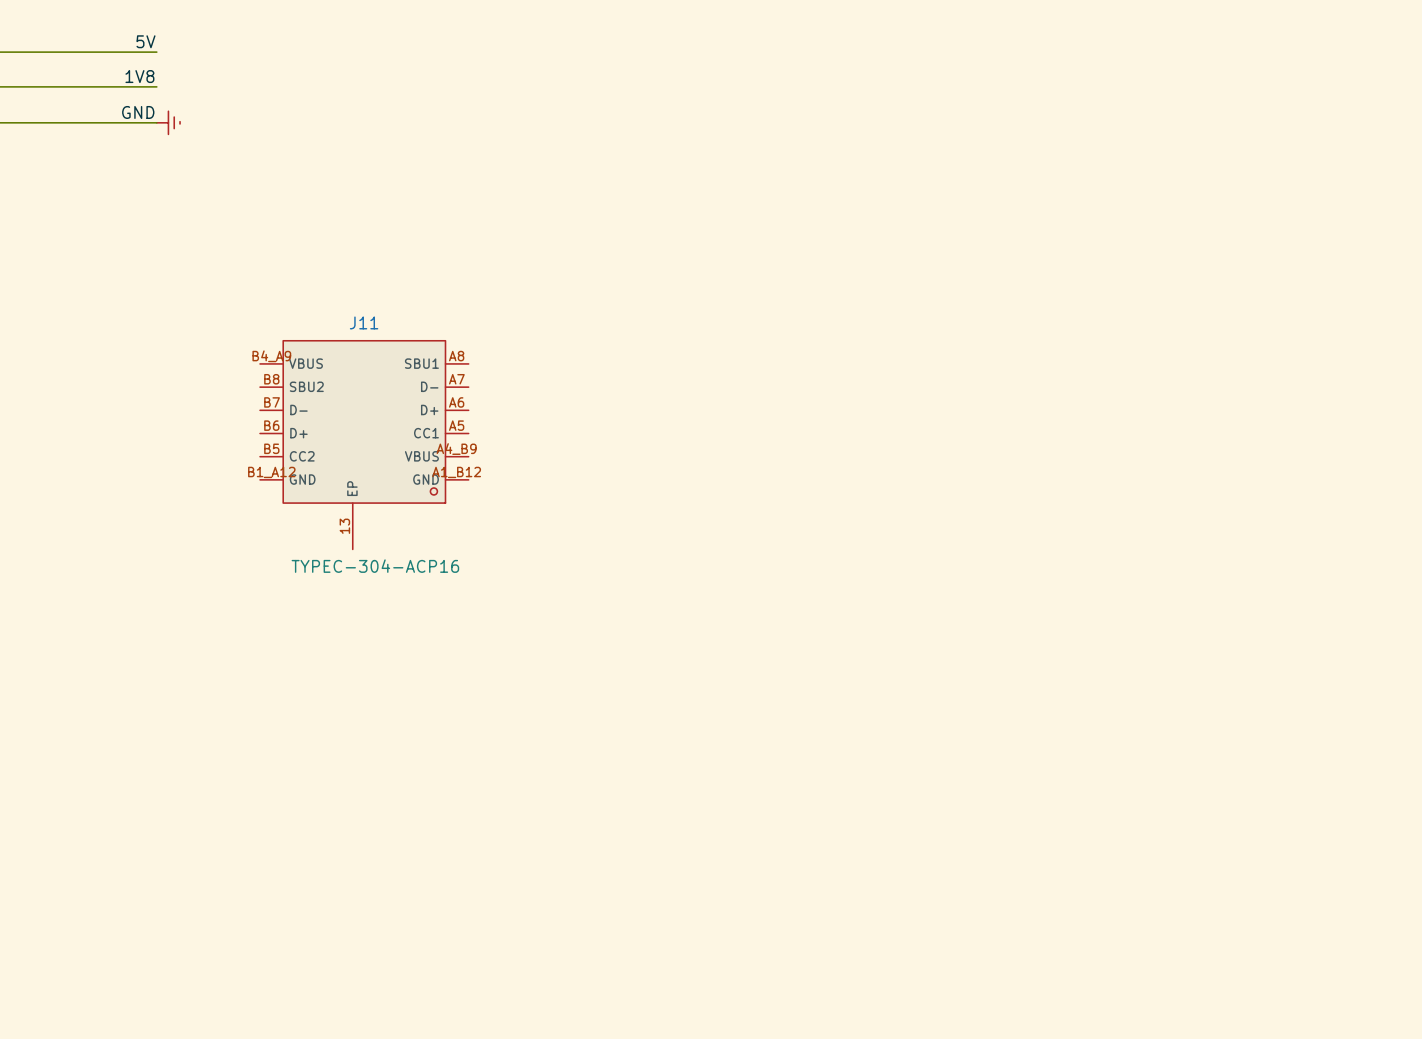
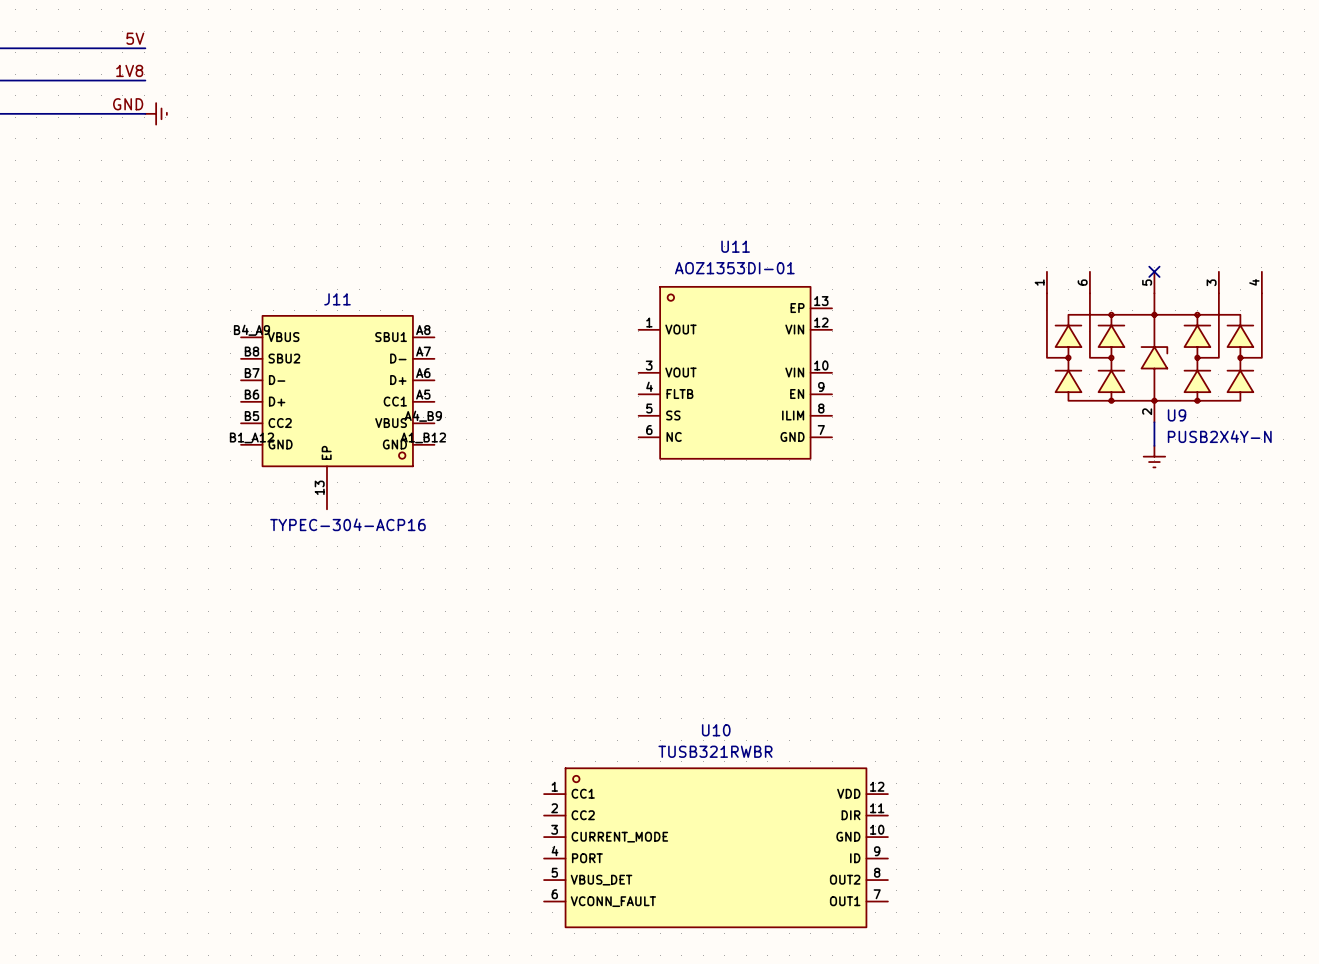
no-connect mark: none -> (1154, 271)
U9: none -> PUSB2X4Y-N (1154, 347)
U11: none -> AOZ1353DI-01 (735, 372)
wire: none -> (1154, 422) (1154, 445)
power symbol: none -> (1154, 456)
U10: none -> TUSB321RWBR (715, 847)

